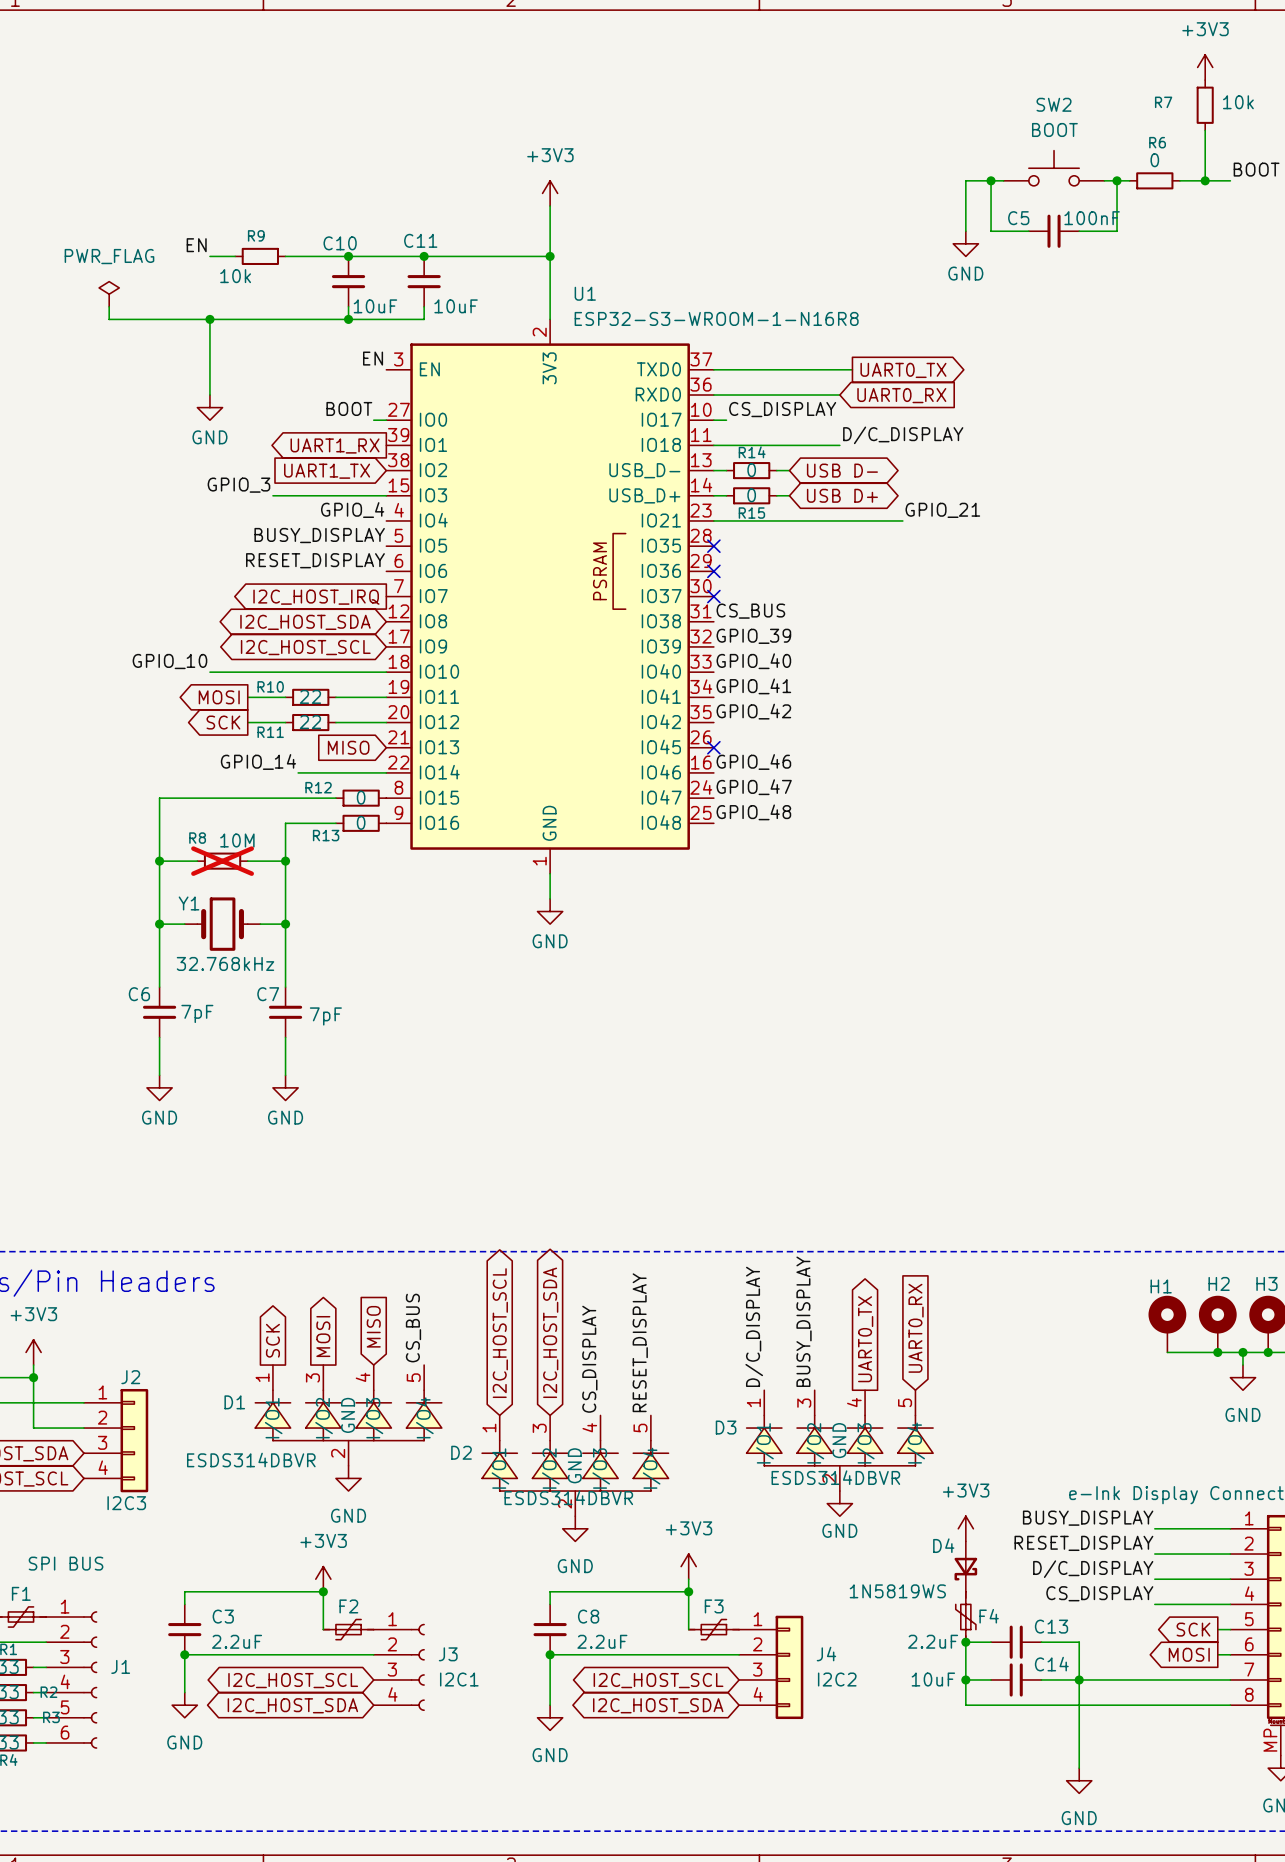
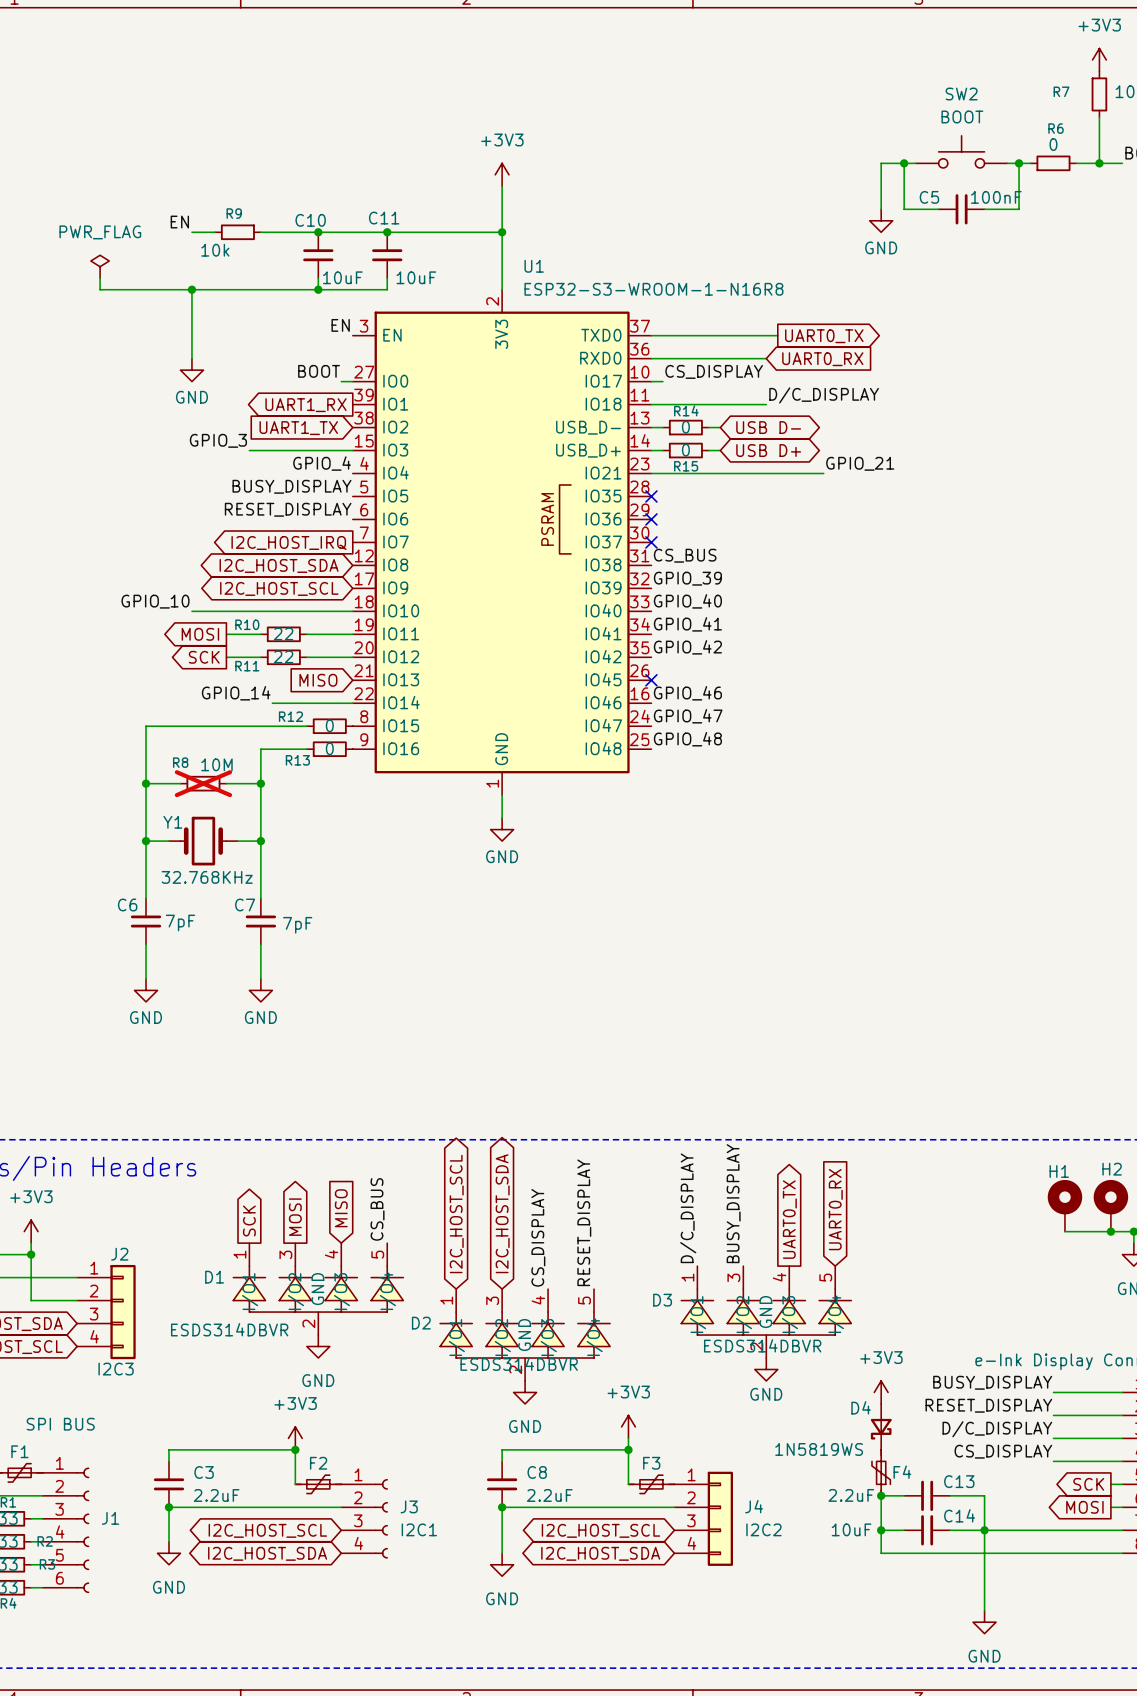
Y1 value: 32.768kHz (225, 963) -> 32.768KHz (207, 877)

